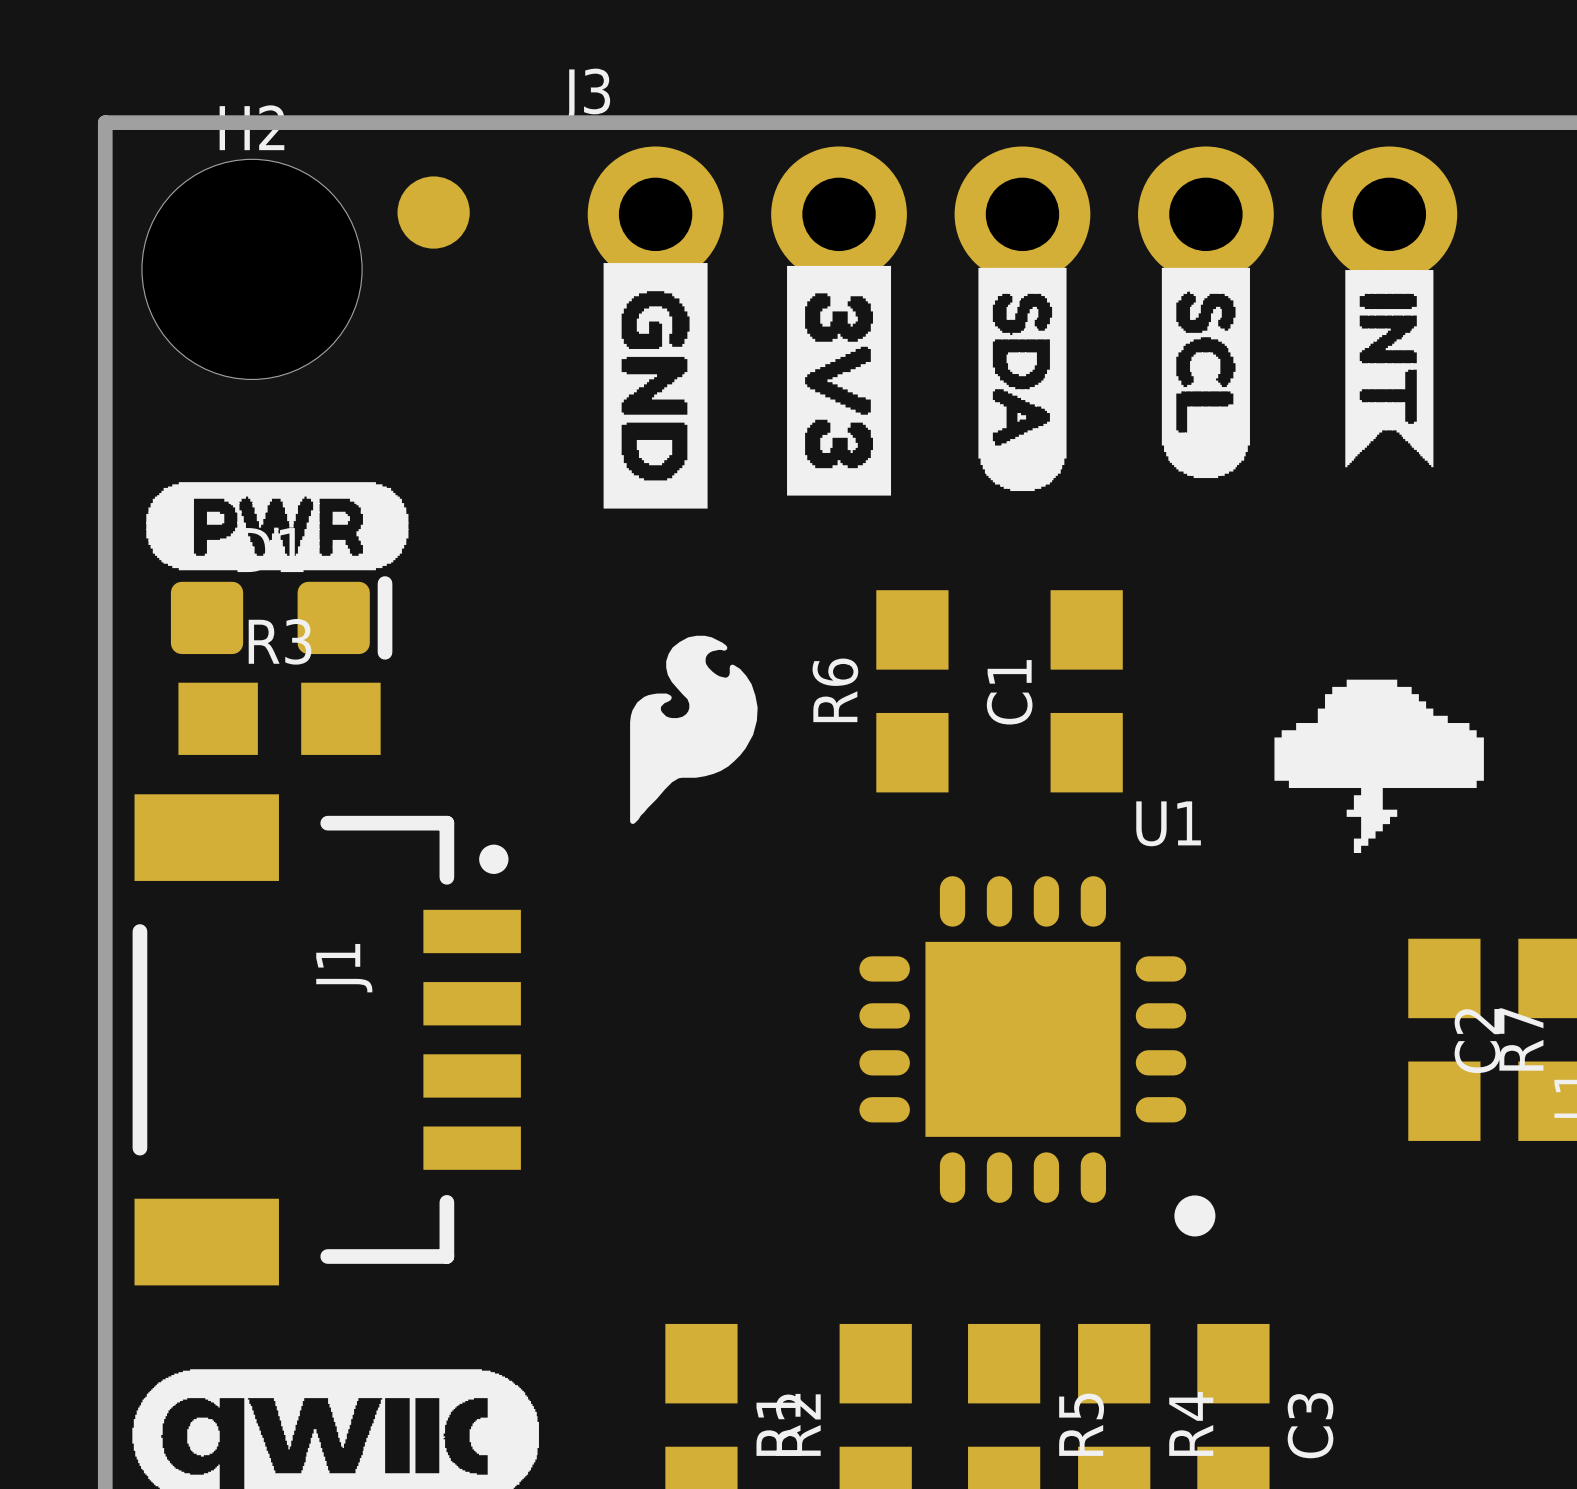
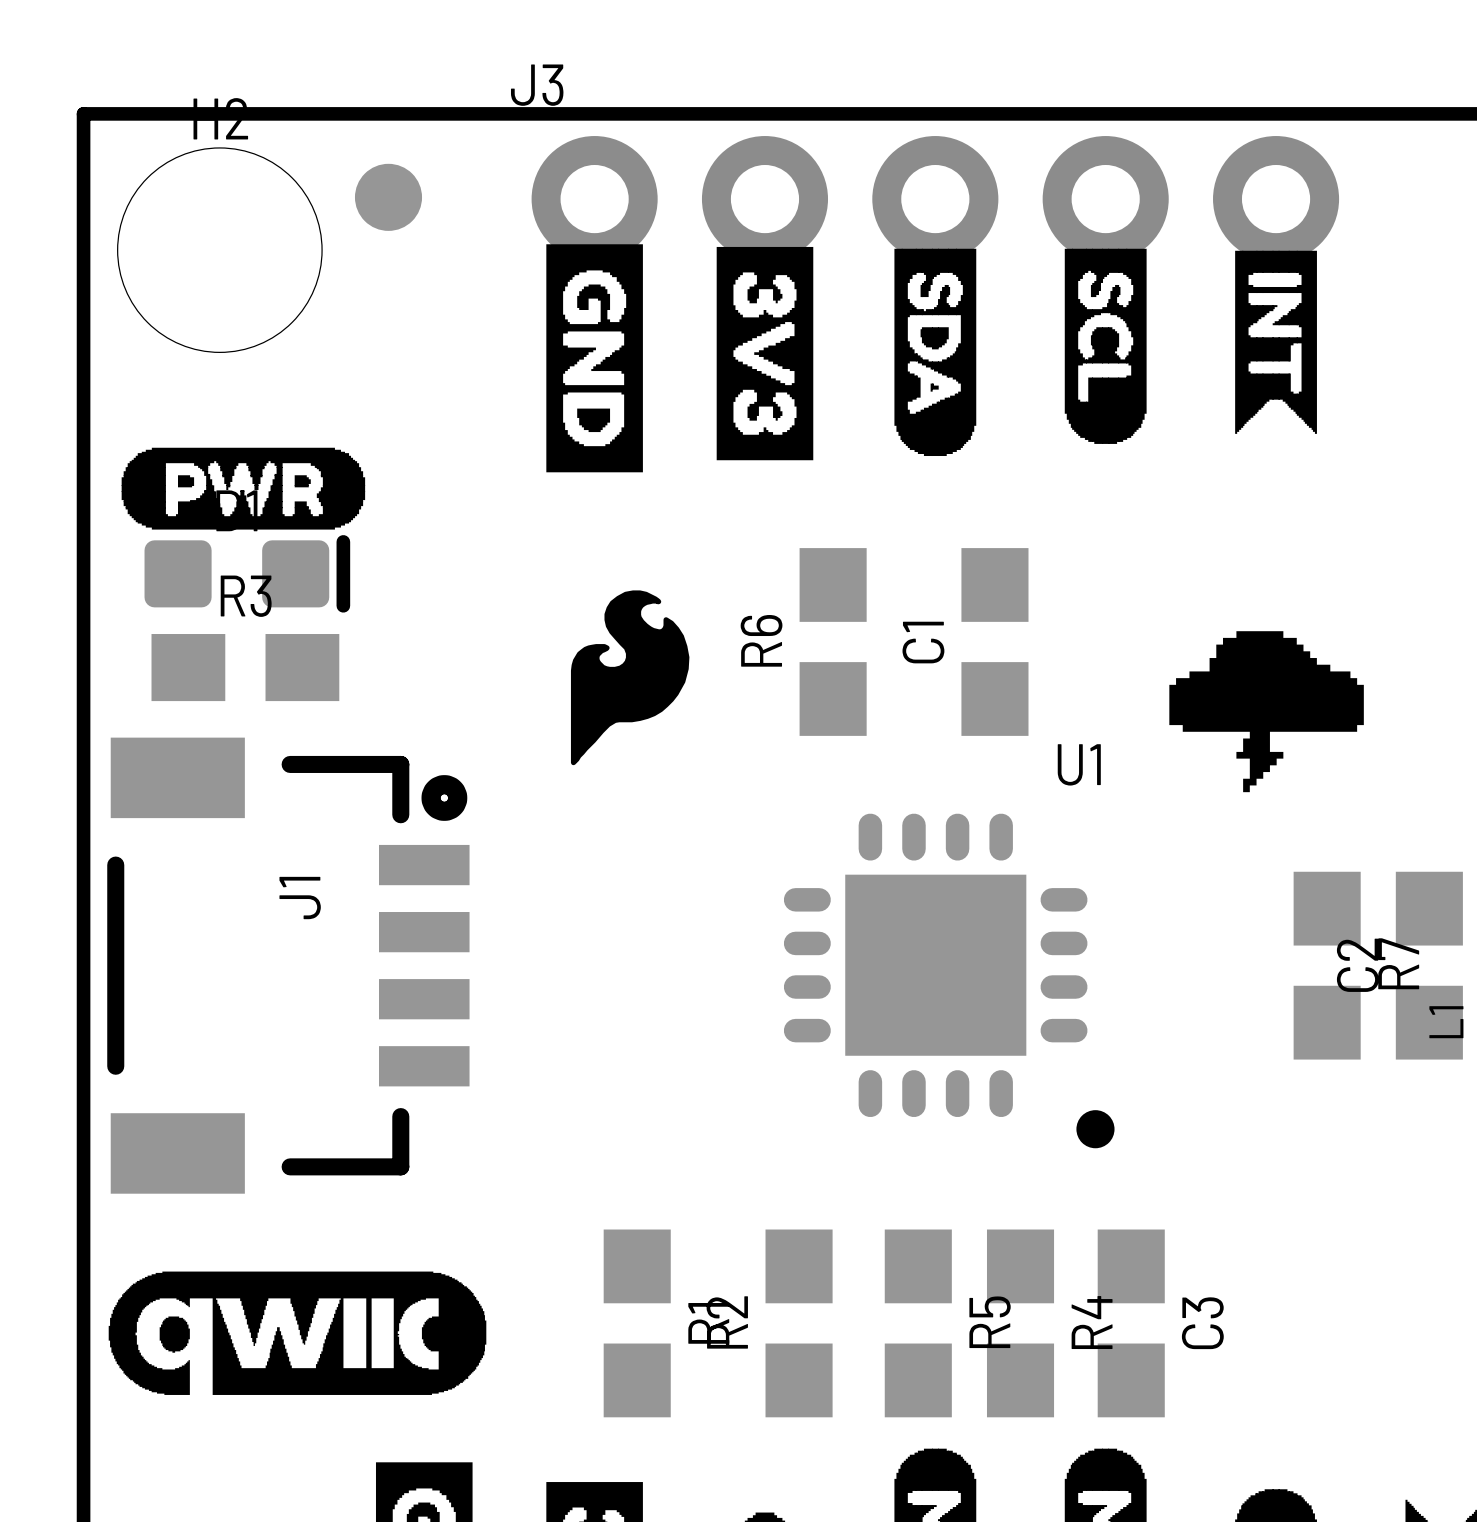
J1 footprint: [132, 794, 521, 1286] -> [107, 737, 470, 1194]

